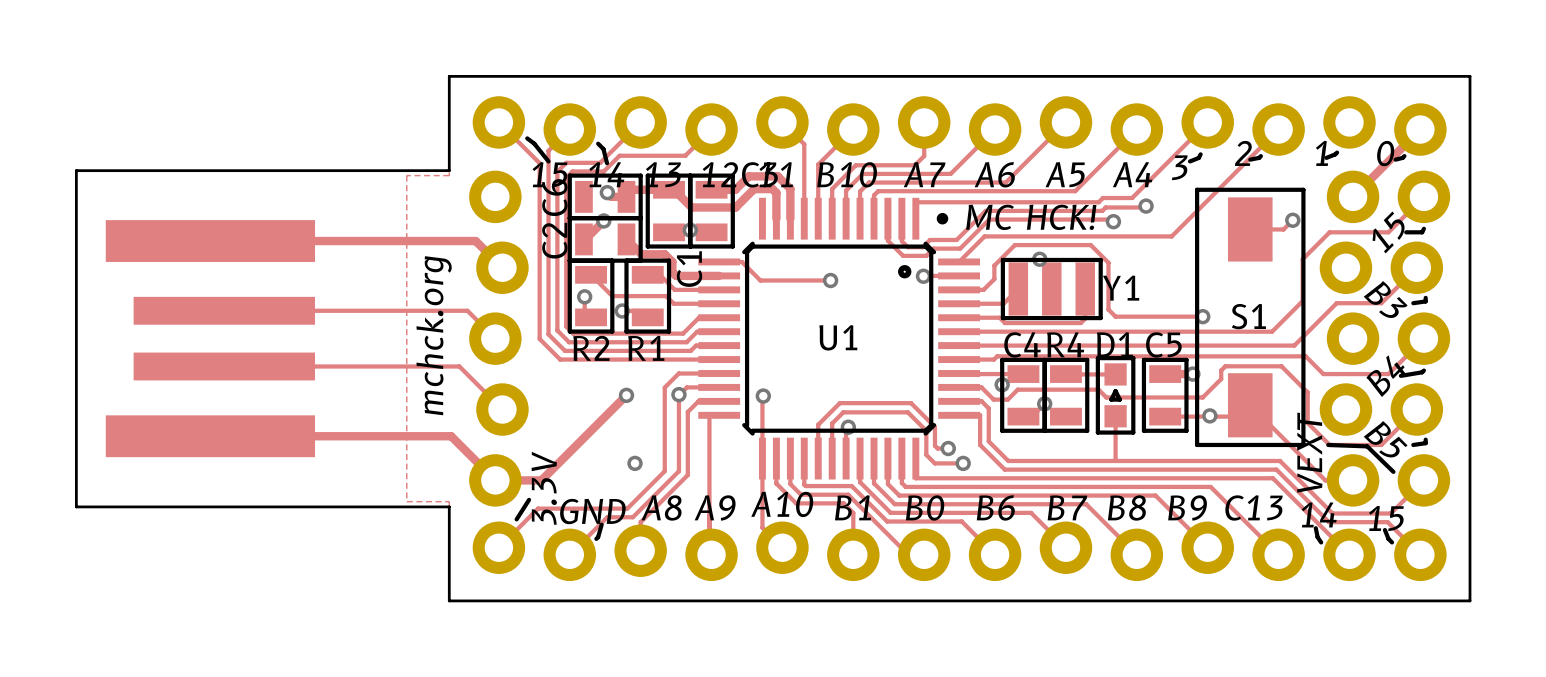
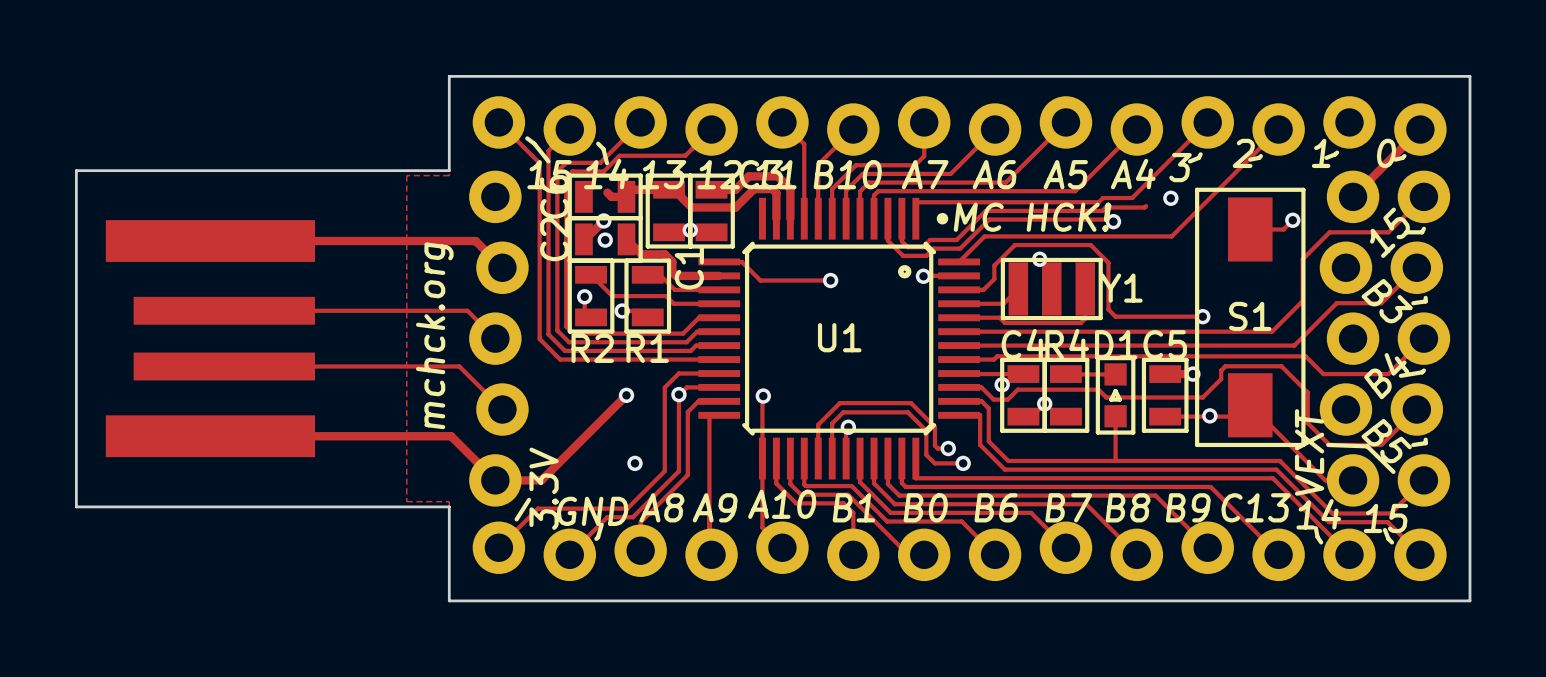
via position: (607, 192) -> (605, 240)
via position: (1146, 206) -> (1170, 198)

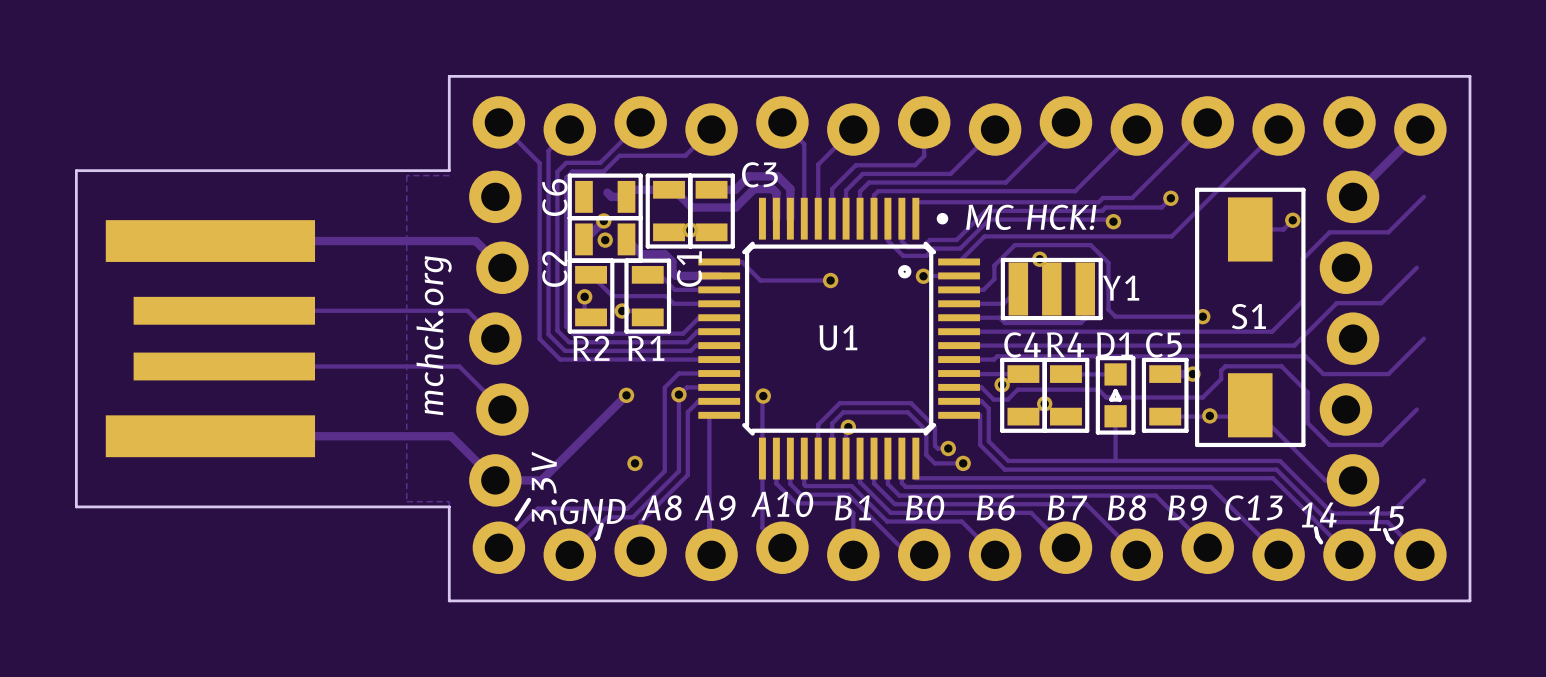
part footprint: [472, 96, 1447, 166] -> [472, 96, 1447, 156]
track: (1146, 206) (1144, 207) -> (1170, 198) (1161, 207) (1144, 207)
C2 name position: C2 (554, 239) -> C2 (554, 269)
part: (1388, 338) -> none

